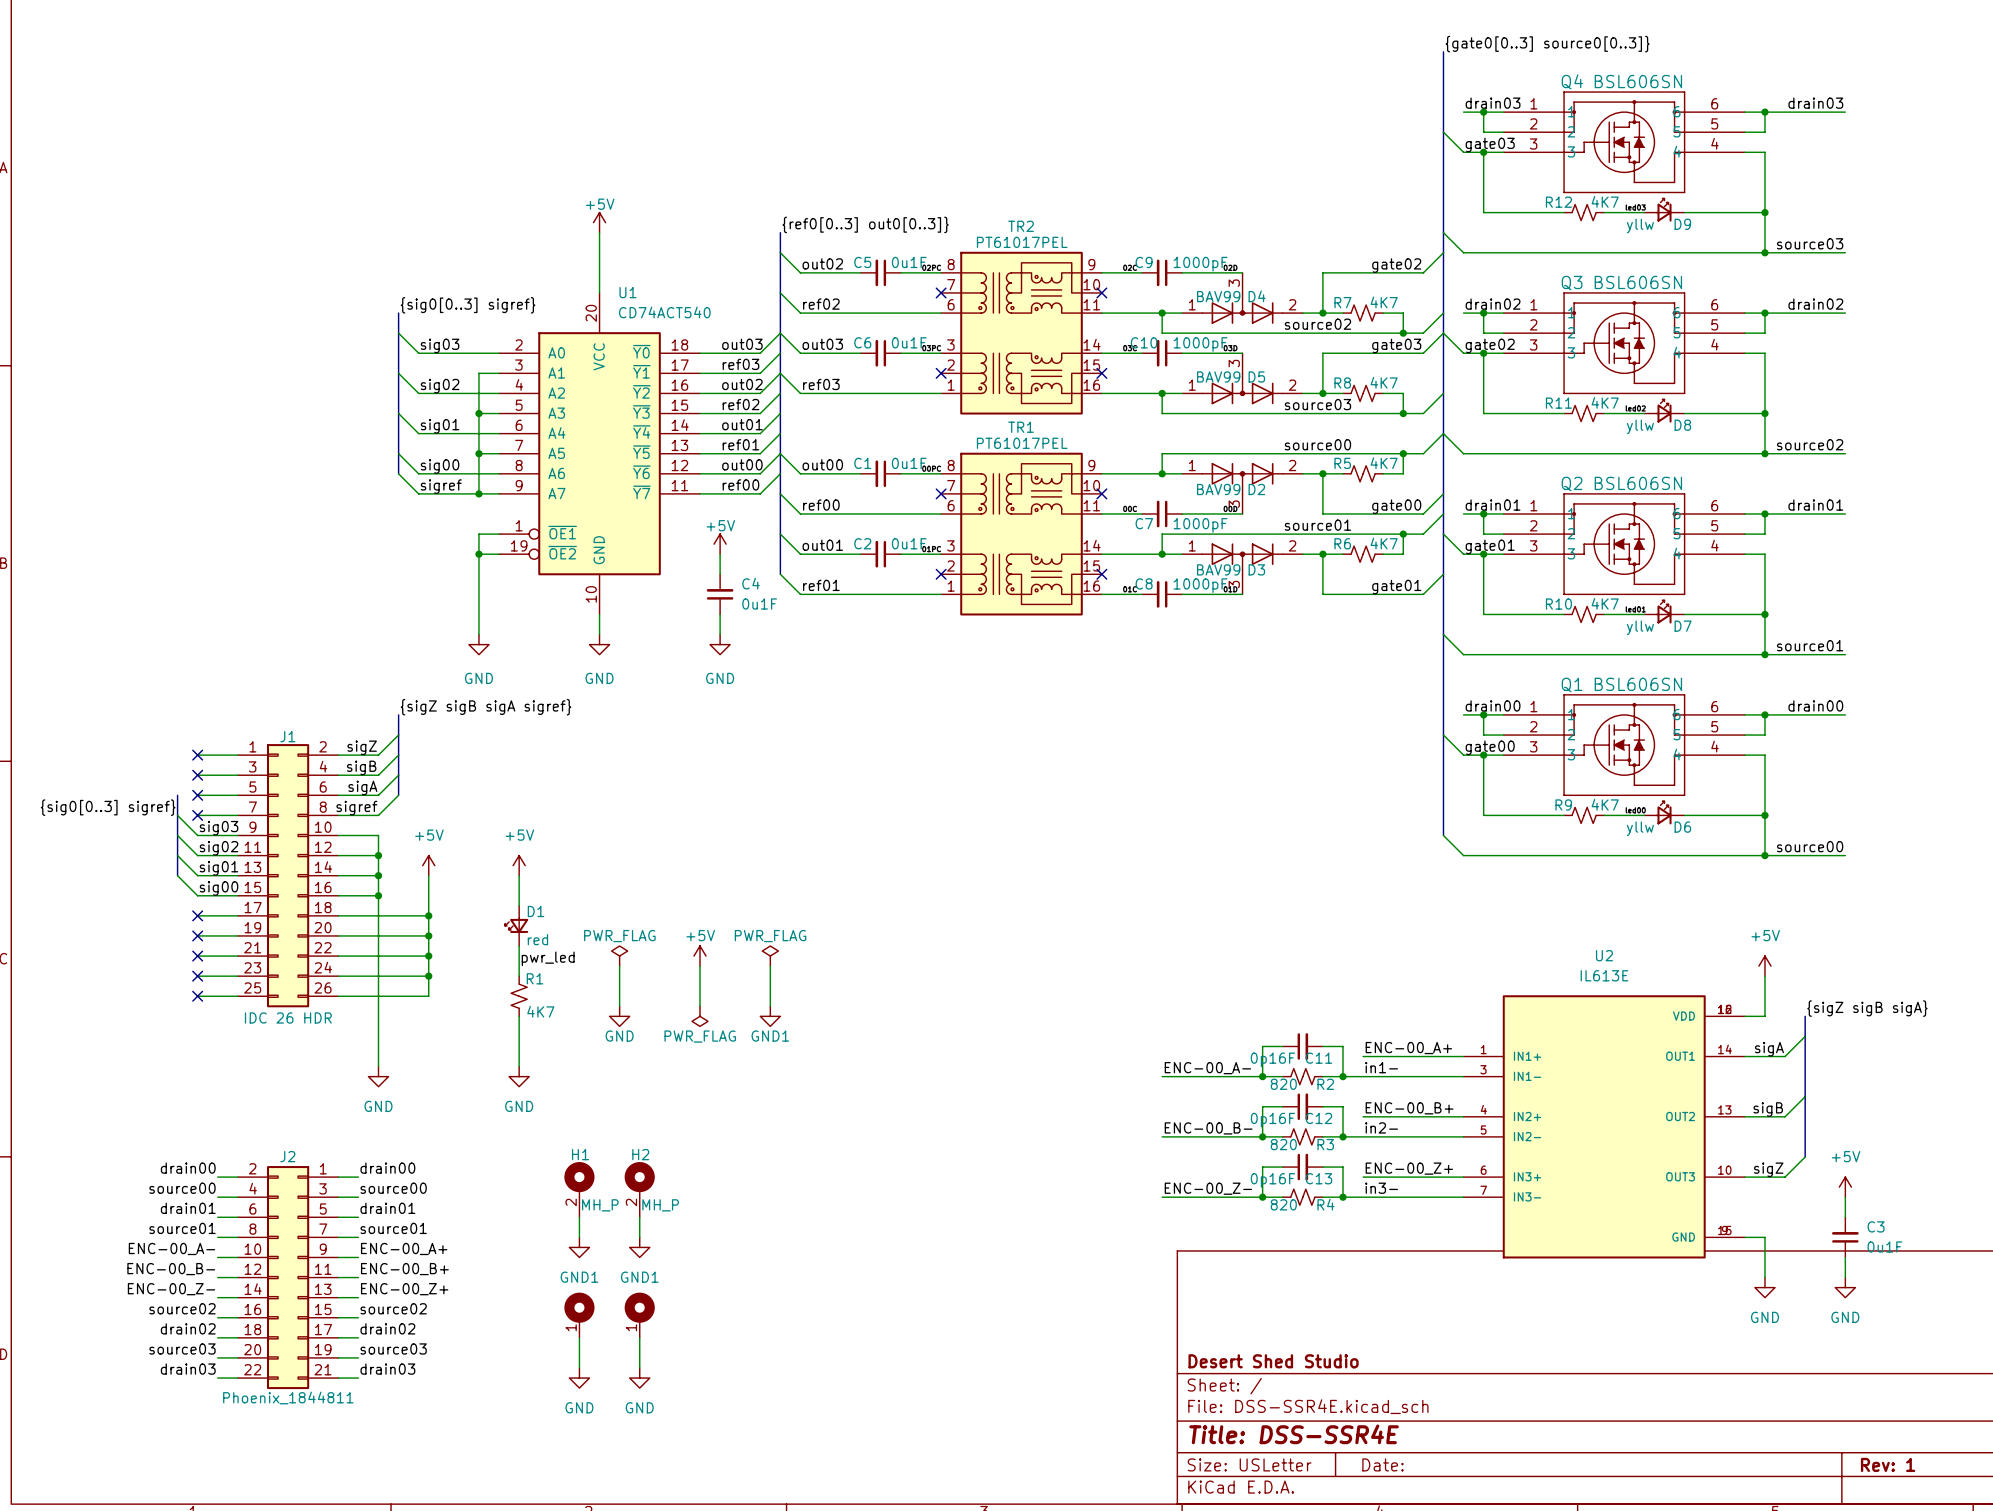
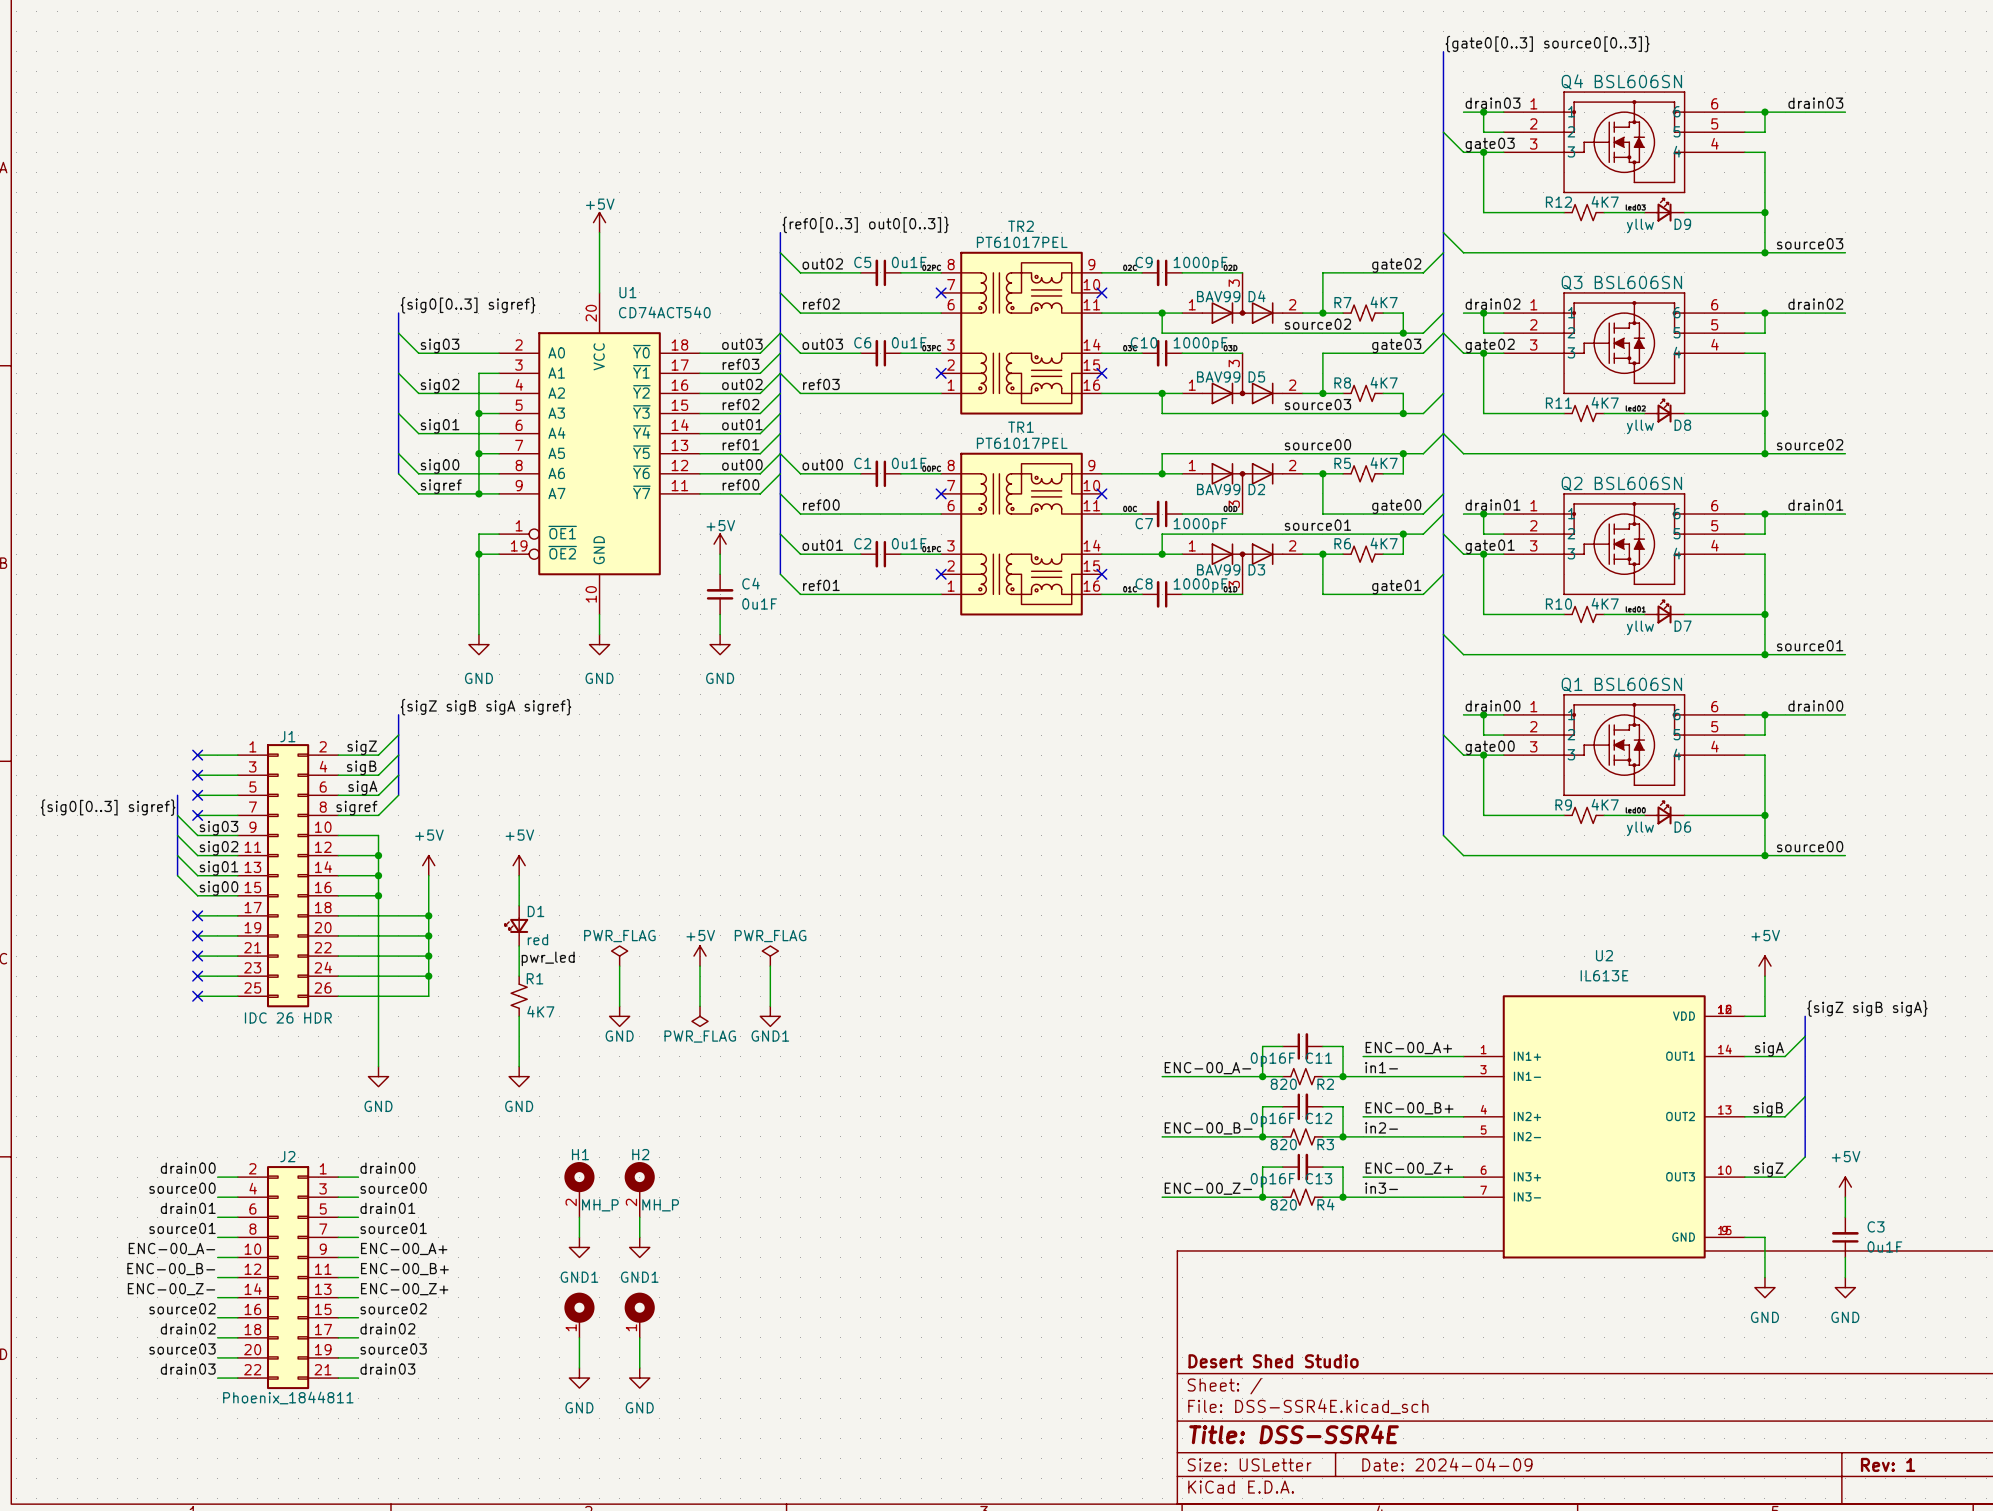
title block: Date: (1382, 1464) -> Date: 2024-04-09 (1447, 1464)

